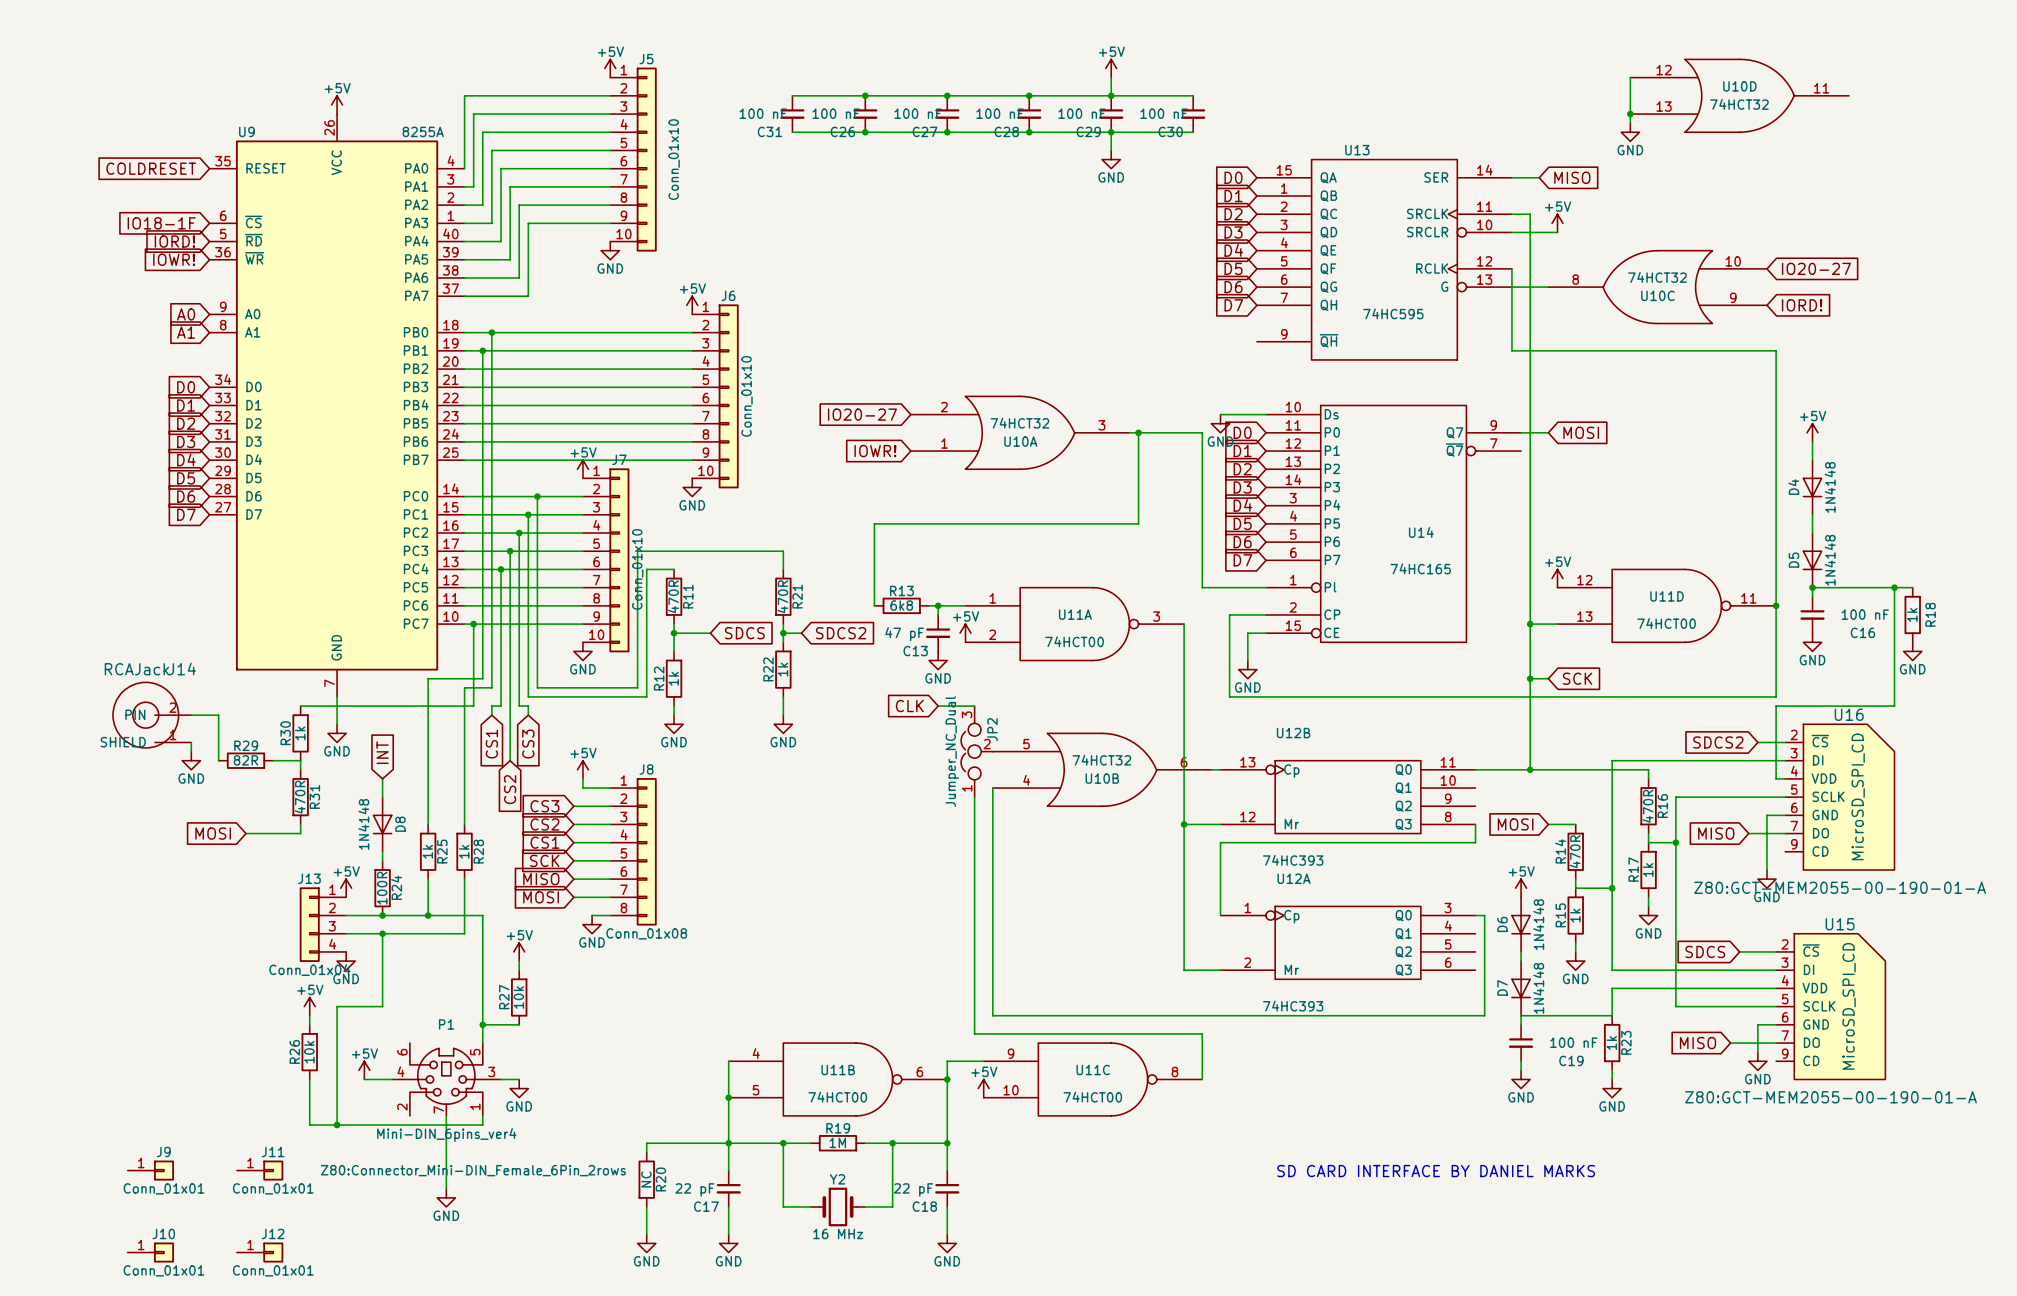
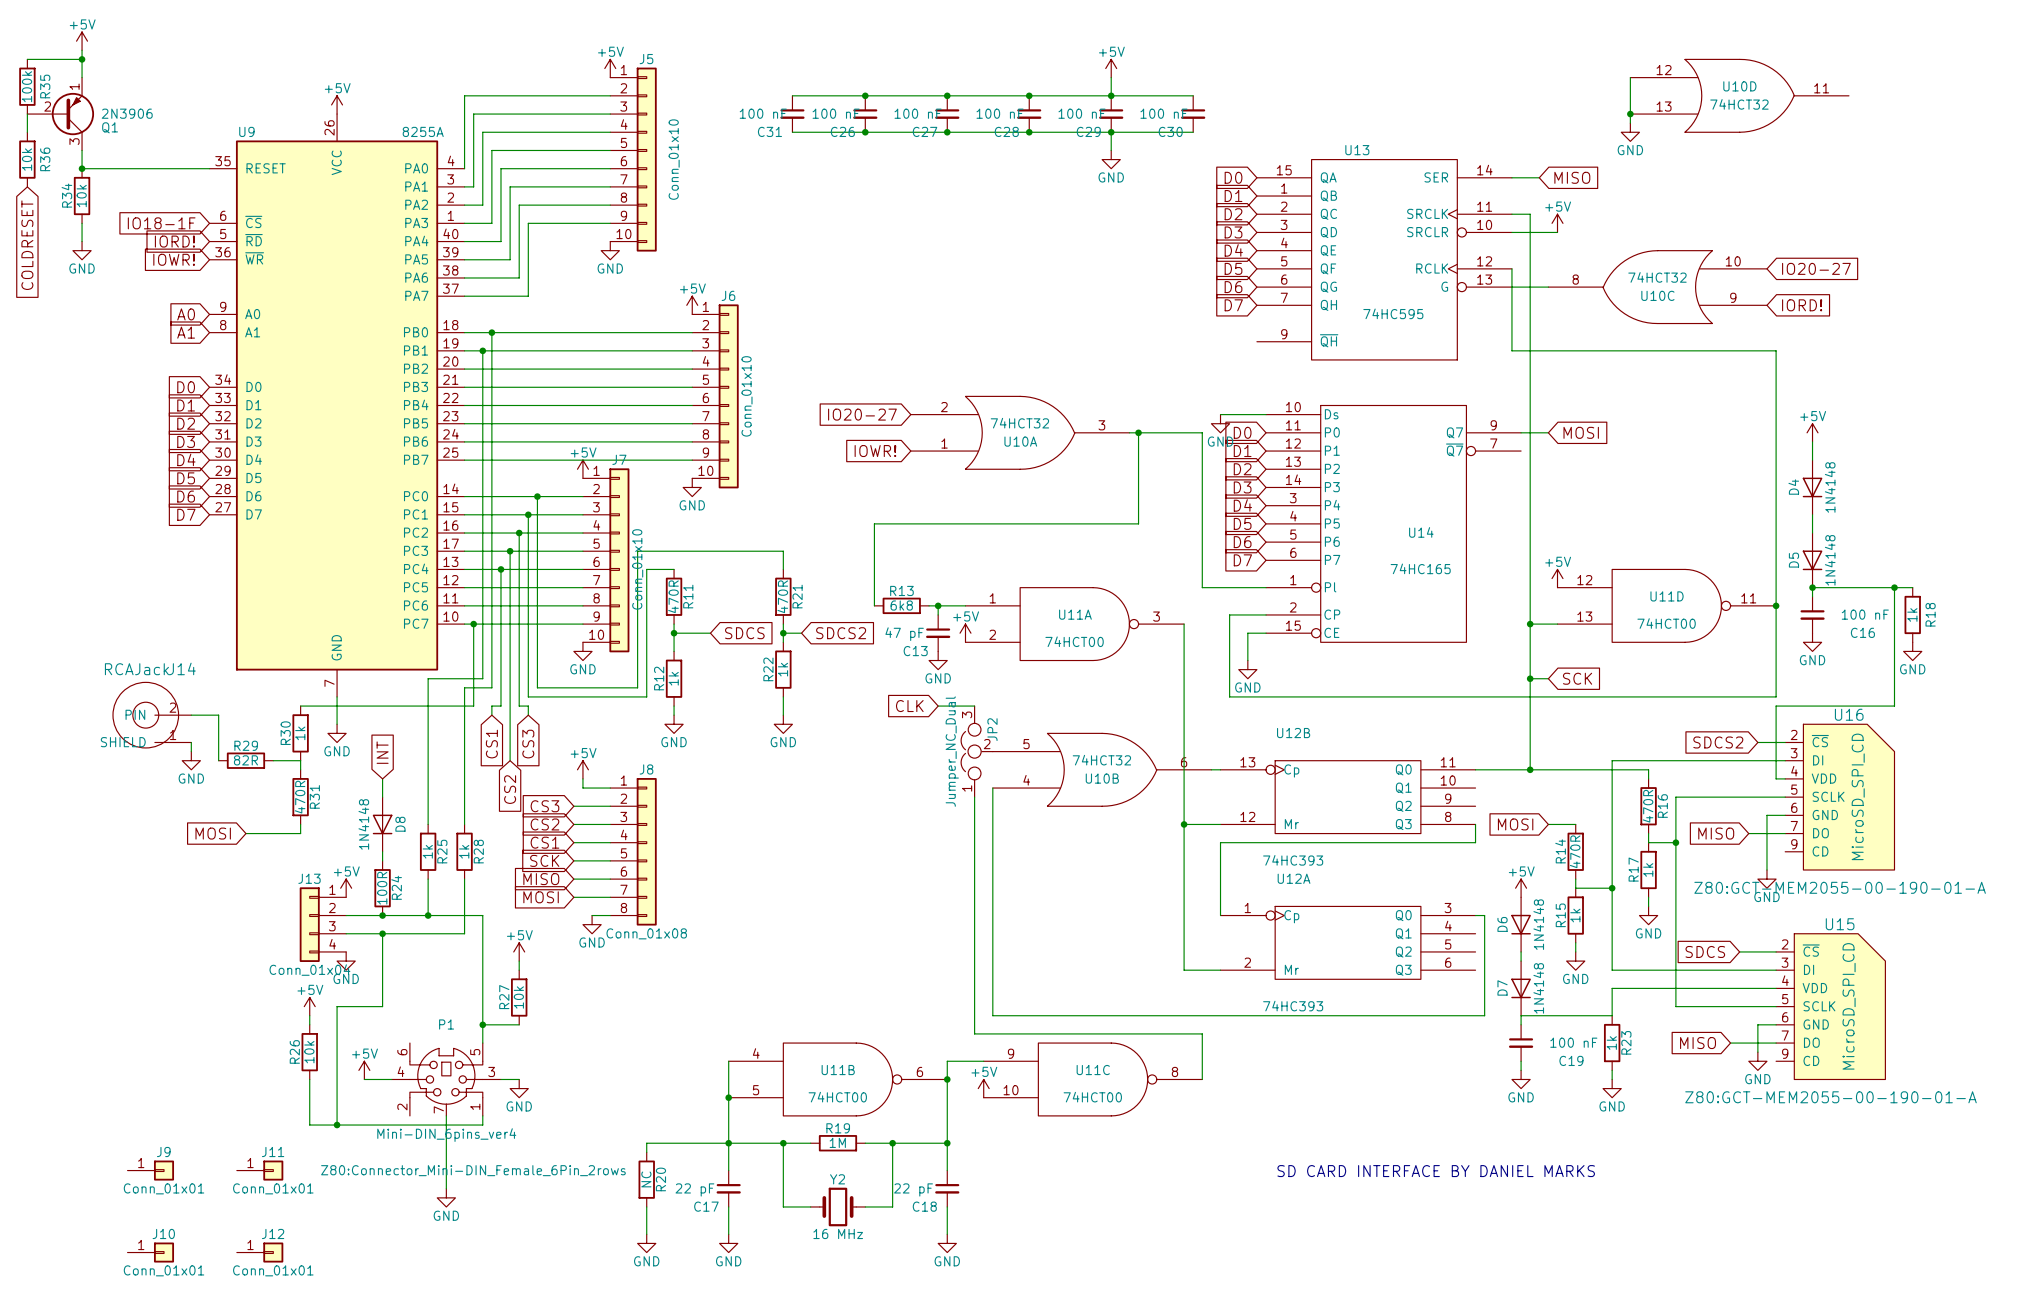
power symbol: none -> +5V (82, 41)
wire: none -> (82, 50) (82, 77)
wire: none -> (27, 59) (82, 59)
junction: none -> (82, 59)
R35: none -> 100k (27, 86)
wire: none -> (27, 114) (27, 132)
Q1: none -> 2N3906 (60, 114)
wire: none -> (82, 150) (82, 168) (209, 168)
R36: none -> 10k (27, 159)
junction: none -> (82, 168)
global label: COLDRESET (151, 168) -> none
R34: none -> 10k (82, 196)
wire: none -> (82, 223) (82, 241)
global label: none -> COLDRESET (27, 245)
power symbol: none -> GND (82, 250)

